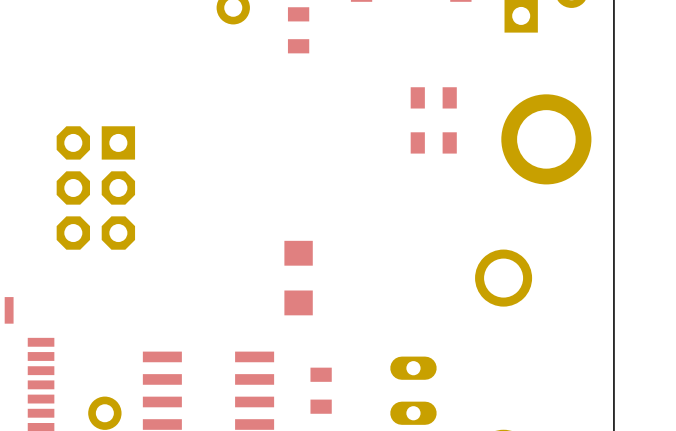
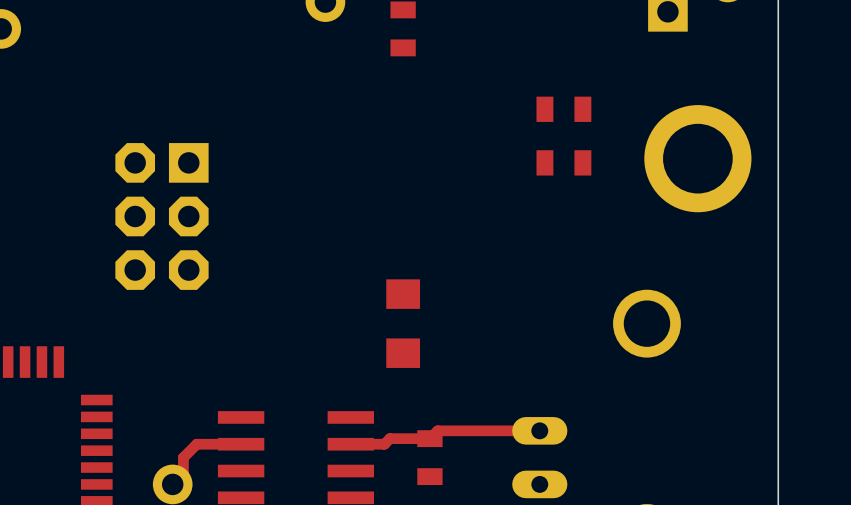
top track: none -> (539, 430) (437, 430) (429, 438) (389, 438) (384, 444) (350, 444)
top track: none -> (241, 444) (196, 444) (183, 457) (183, 473) (172, 484)

